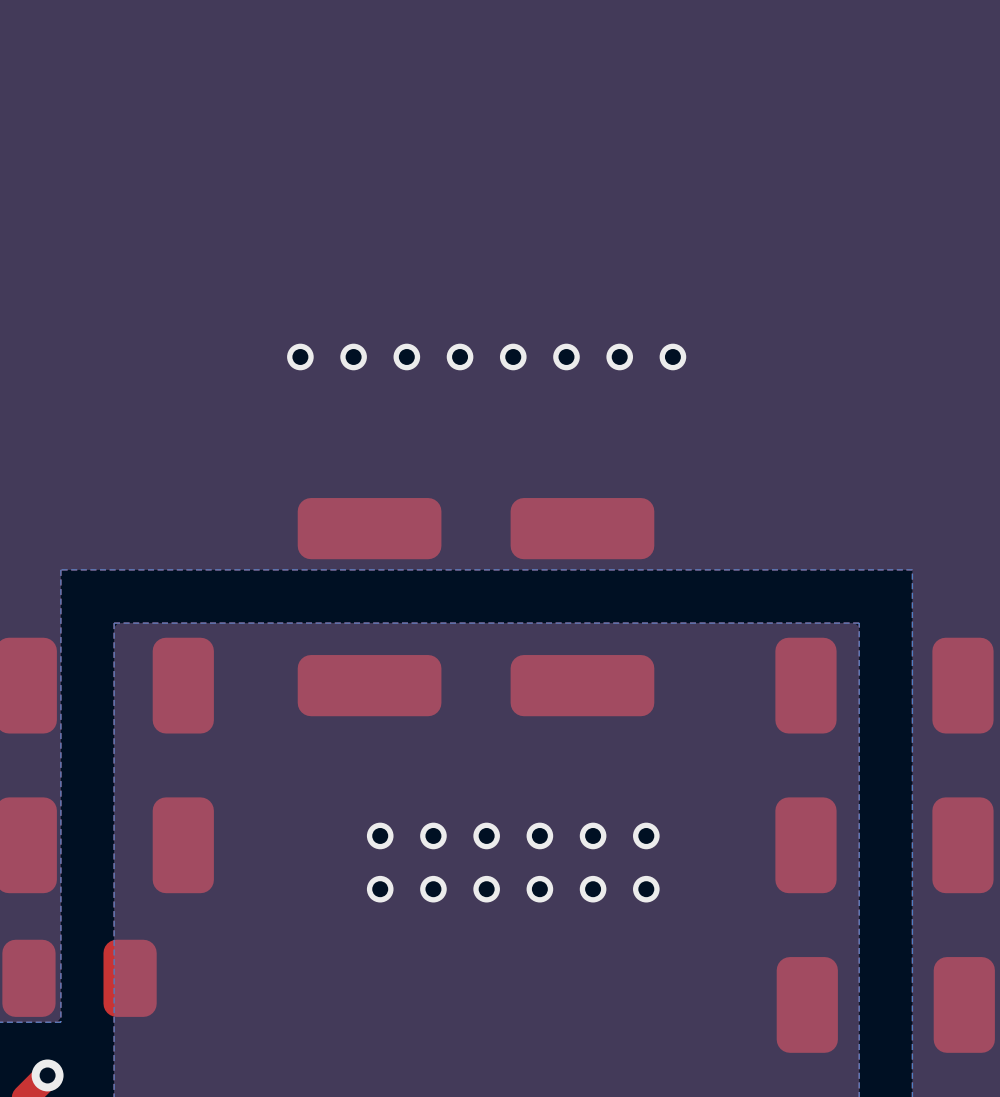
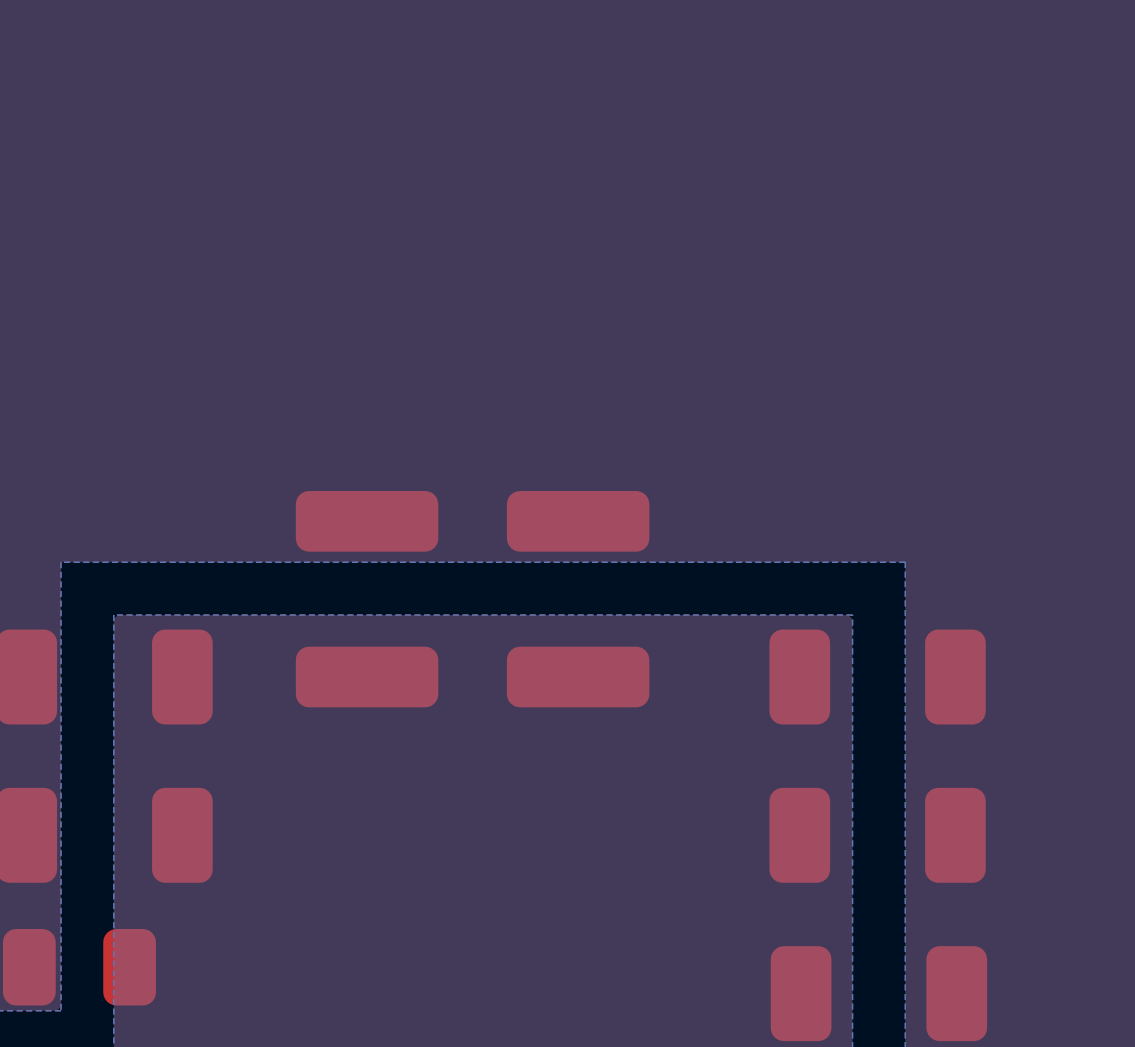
via: (300, 356) -> none
via: (353, 356) -> none
via: (406, 356) -> none
via: (460, 356) -> none
via: (513, 356) -> none
via: (566, 356) -> none
via: (619, 356) -> none
via: (672, 356) -> none
via: (380, 835) -> none
via: (433, 835) -> none
via: (486, 835) -> none
via: (539, 835) -> none
via: (593, 835) -> none
via: (646, 835) -> none
via: (380, 889) -> none
via: (433, 889) -> none
via: (486, 889) -> none
via: (539, 889) -> none
via: (593, 889) -> none
via: (646, 889) -> none

